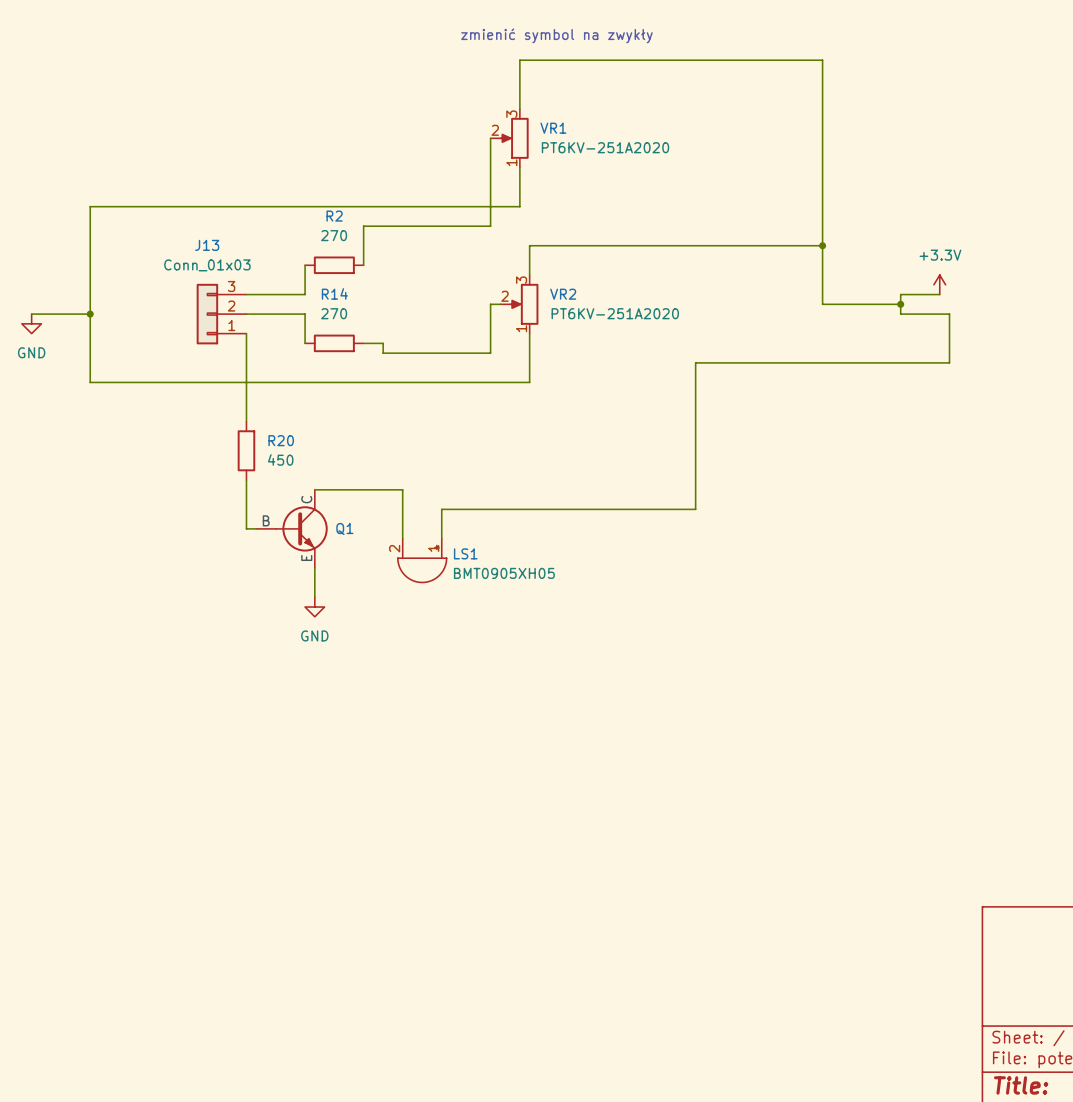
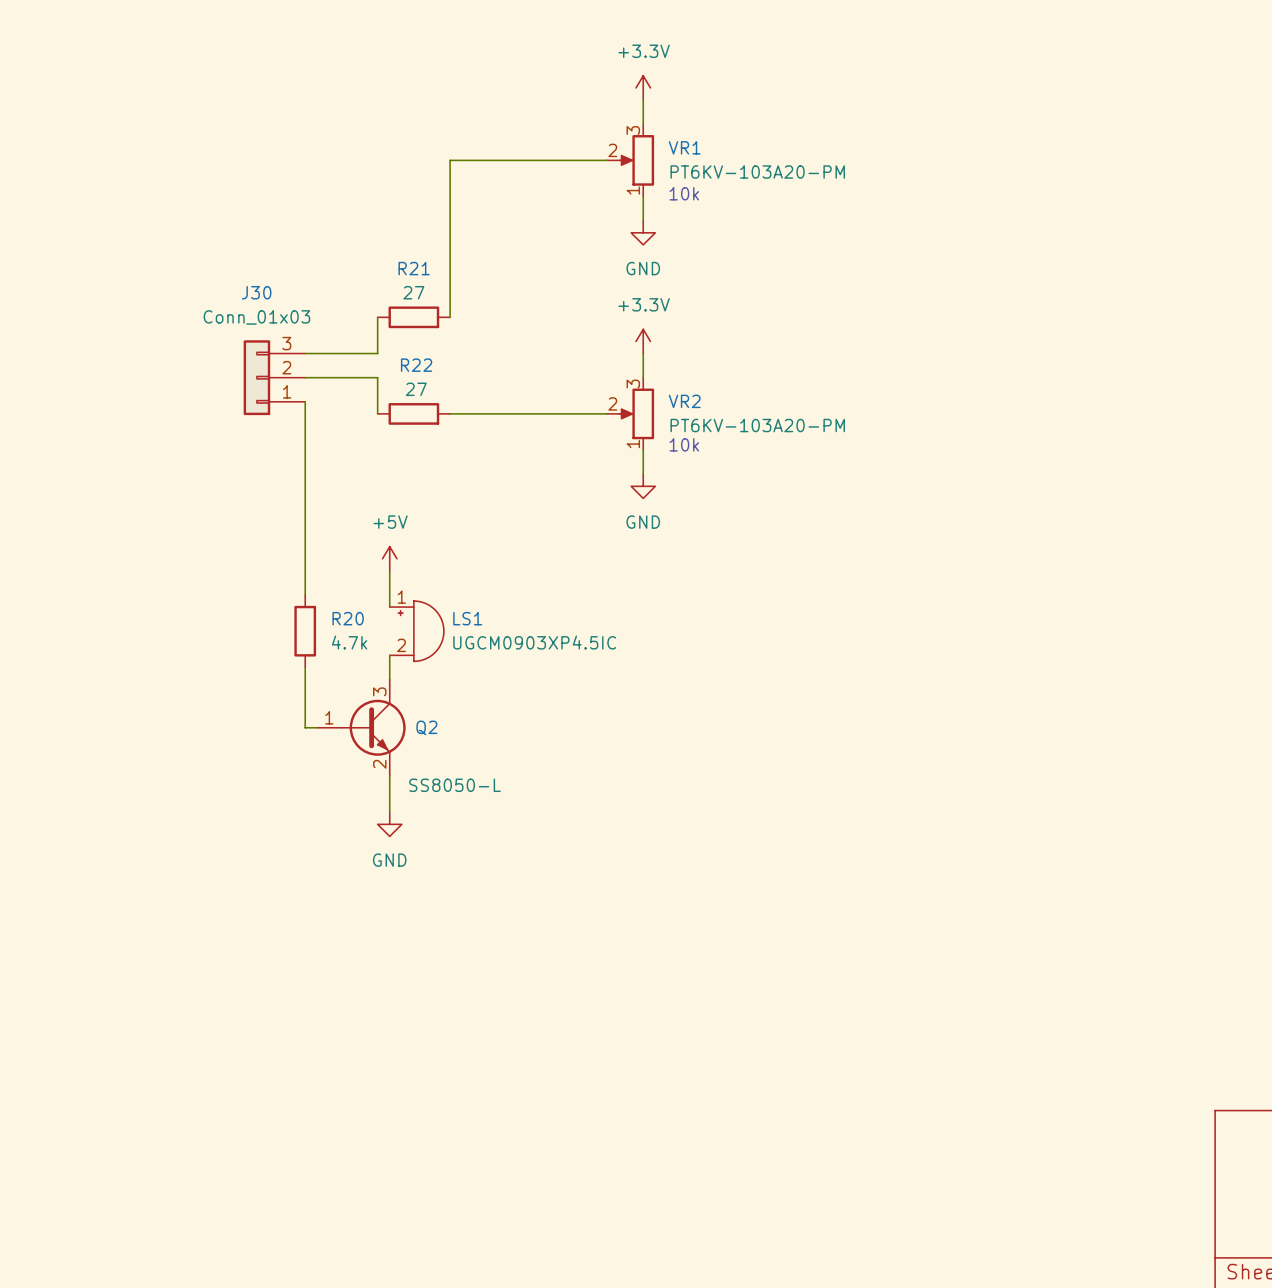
text: zmienić symbol na zwykły (556, 35) -> none
power symbol: none -> +3.3V (643, 87)
wire: (519, 89) (519, 60) (822, 60) (822, 304) (900, 304) -> none
wire: (490, 138) (490, 226) (363, 226) -> (607, 160) (450, 160) (450, 269)
VR1 value: PT6KV-251A2020 (605, 147) -> PT6KV-103A20-PM (757, 172)
text: none -> 10k (684, 193)
wire: (519, 187) (519, 206) (90, 206) (90, 382) (529, 382) (529, 333) -> none
power symbol: none -> GND (643, 232)
R2 name: R2 (334, 216) -> R21 (414, 268)
R2 value: 270 (334, 235) -> 27 (413, 292)
J13 name: J13 (207, 245) -> J30 (256, 292)
wire: (822, 245) (529, 245) (529, 275) -> none
junction: (822, 245) -> none
power symbol: none -> +3.3V (643, 341)
power symbol: +3.3V (939, 284) -> none
R14 name: R14 (334, 293) -> R22 (416, 365)
wire: none -> (643, 353) (643, 377)
wire: (939, 294) (900, 294) (900, 314) (949, 314) (949, 362) (695, 362) (695, 509) (441, 509) (441, 538) -> none
wire: (500, 304) (490, 304) (490, 353) (383, 353) (383, 343) -> (607, 413) (474, 413)
VR2 position: (519, 304) -> (630, 413)
junction: (900, 304) -> none
R14 value: 270 (334, 313) -> 27 (416, 389)
VR2 value: PT6KV-251A2020 (615, 313) -> PT6KV-103A20-PM (757, 425)
wire: (31, 314) (90, 314) -> none
junction: (90, 314) -> none
power symbol: GND (31, 323) -> none
text: none -> 10k (684, 444)
wire: none -> (643, 450) (643, 474)
power symbol: none -> GND (643, 486)
wire: none -> (305, 510) (305, 582)
R20 position: (246, 450) -> (305, 631)
R20 value: 450 (280, 459) -> 4.7k (349, 642)
power symbol: none -> +5V (389, 558)
wire: none -> (389, 570) (389, 607)
wire: (246, 489) (246, 528) (256, 528) -> none
wire: (314, 489) (402, 489) (402, 538) -> none
Q1: (291, 528) -> none
wire: none -> (305, 667) (305, 727) (317, 727)
LS1 position: (422, 560) -> (416, 631)
LS1 rotation: 0° (422, 564) -> 90° counterclockwise (421, 631)
wire: (314, 567) (314, 597) -> (389, 776) (389, 812)
LS1 value: BMT0905XH05 (504, 573) -> UGCM0903XP4.5IC (534, 642)
Q2: none -> SS8050-L (361, 727)
power symbol position: GND (314, 607) -> GND (389, 824)

